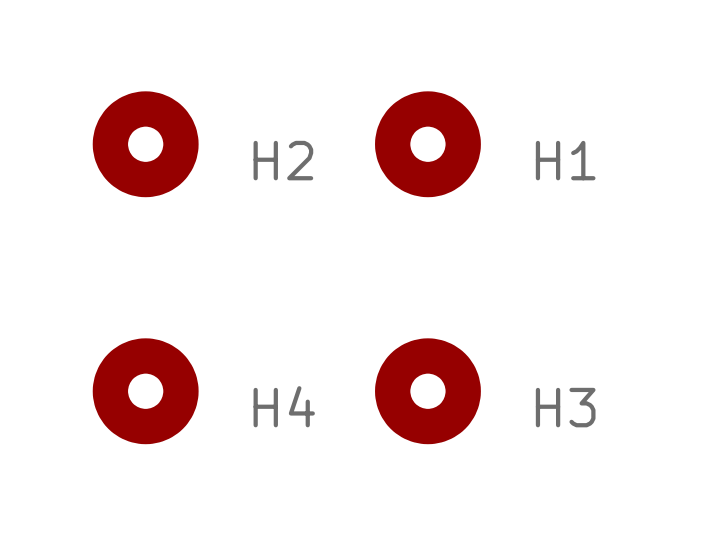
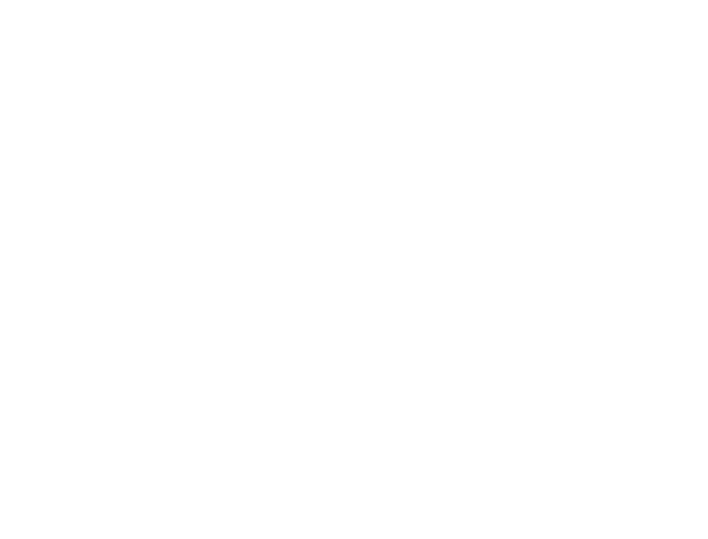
H2: (145, 144) -> none
H1: (427, 144) -> none
H4: (145, 391) -> none
H3: (427, 391) -> none

